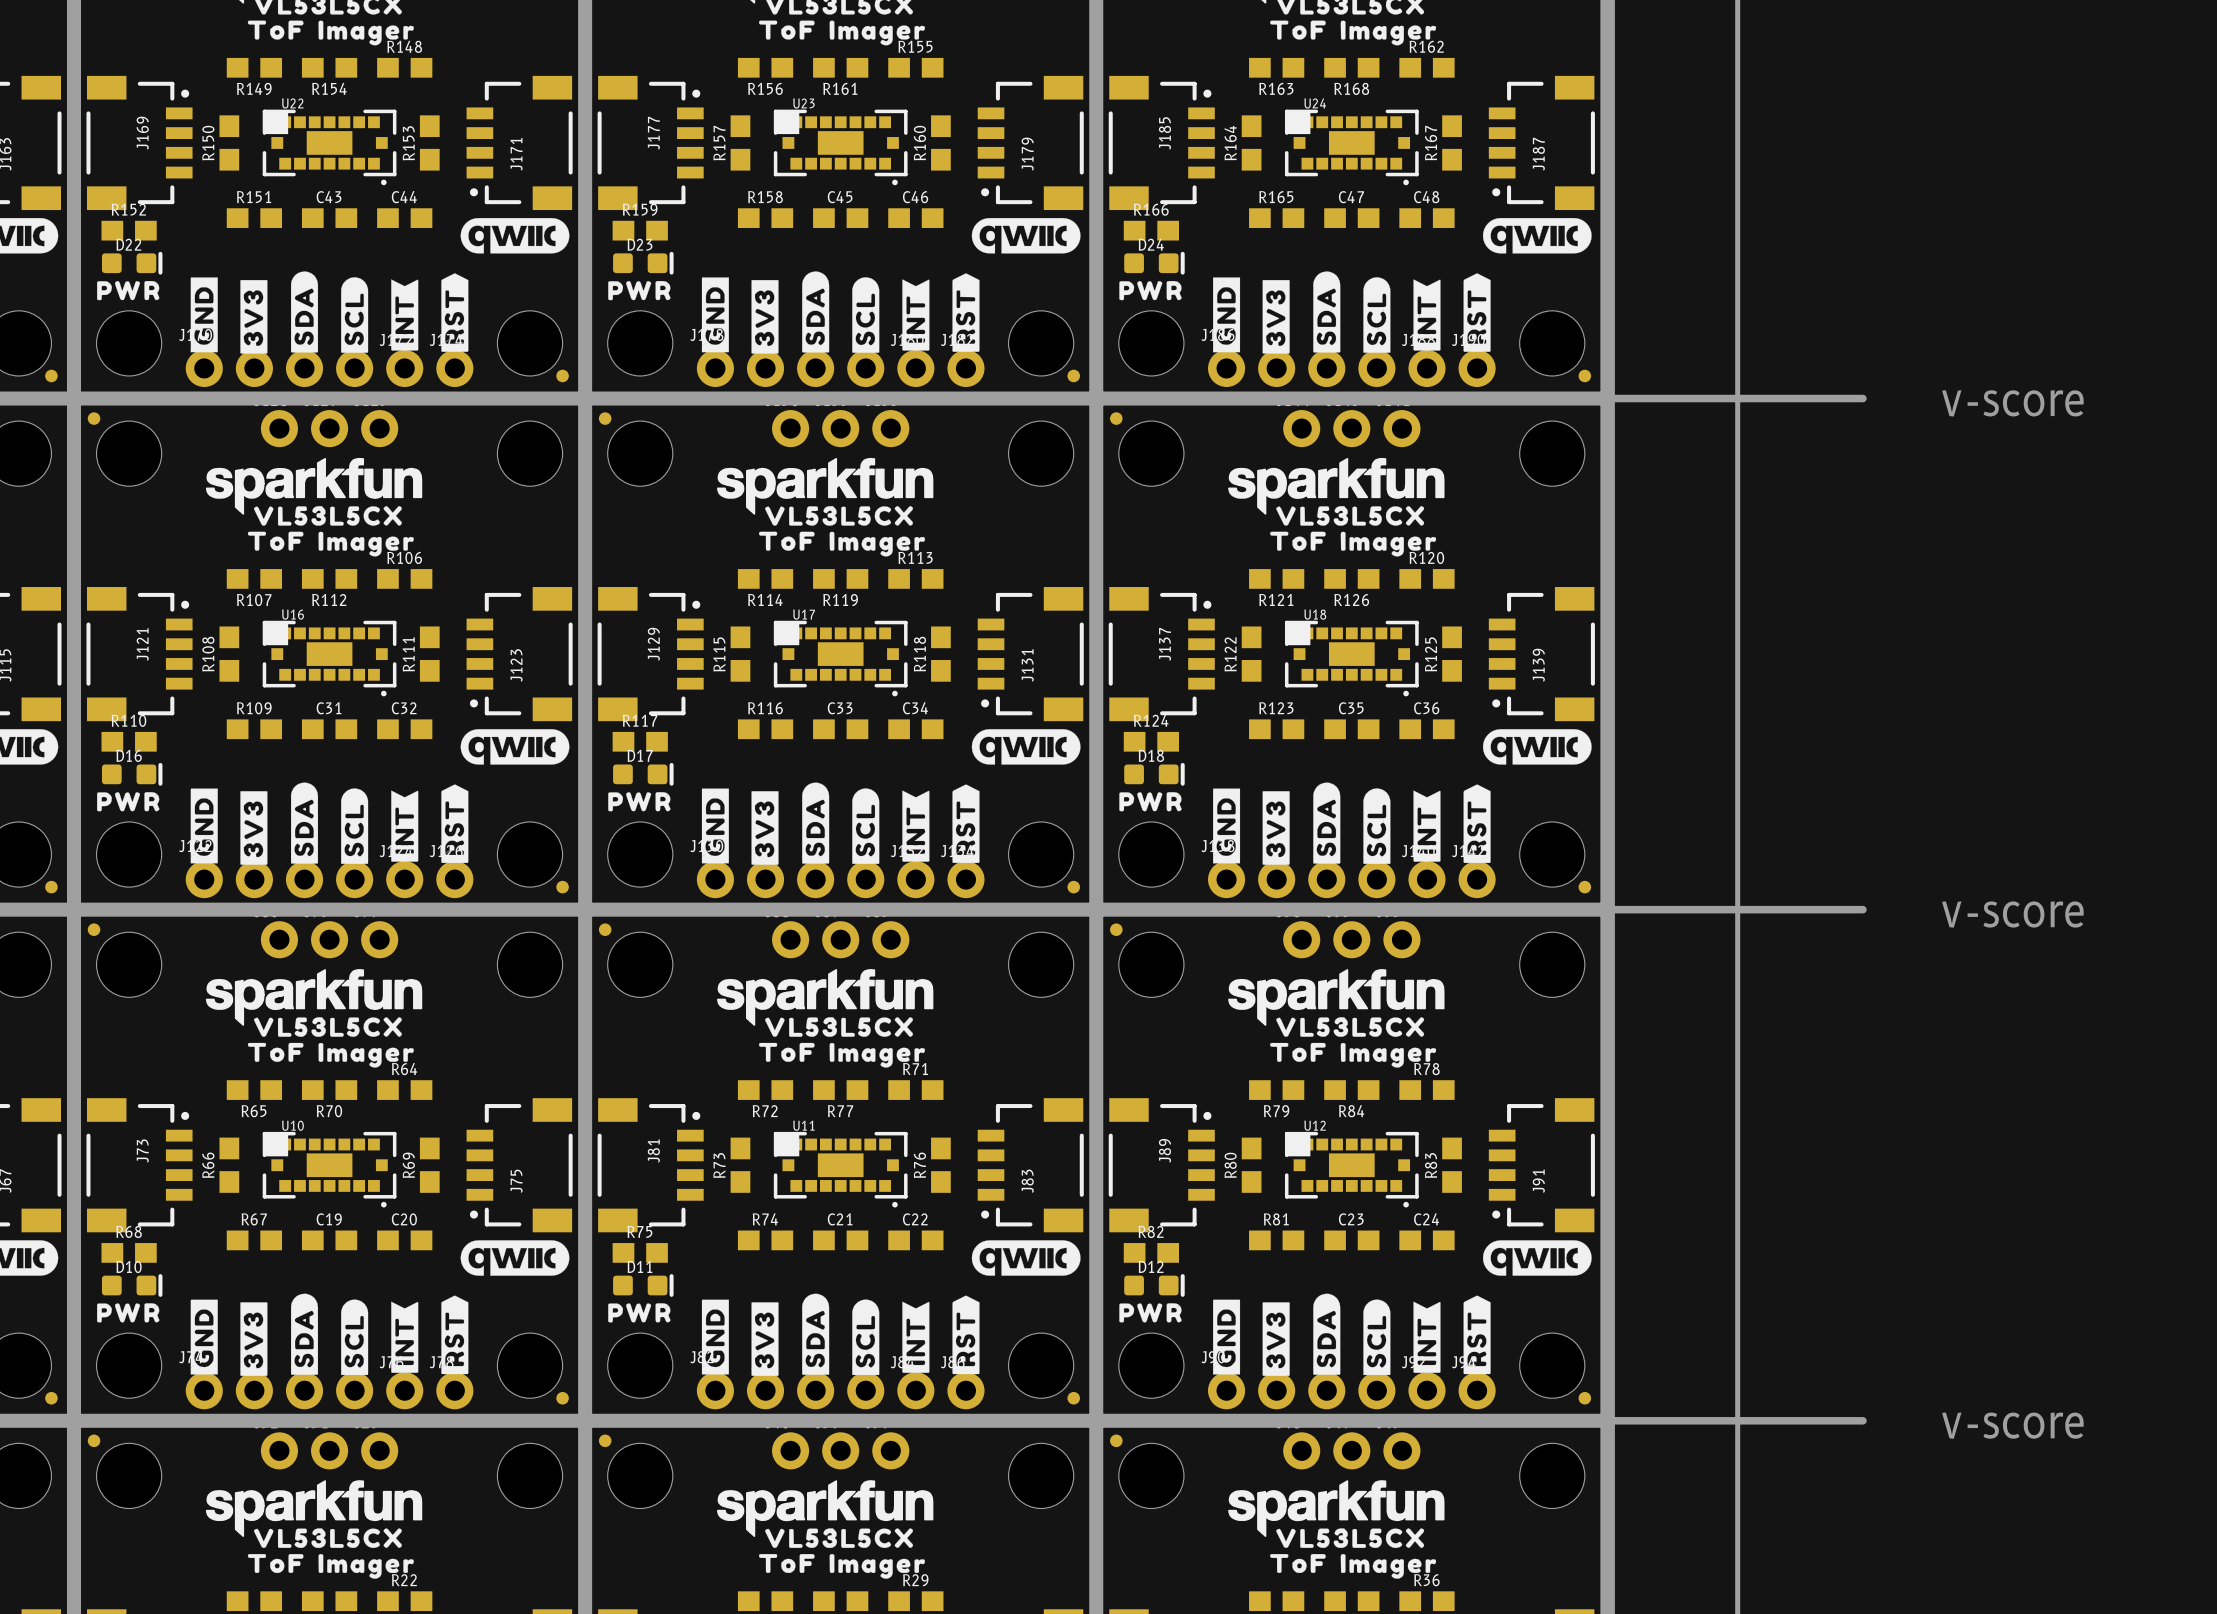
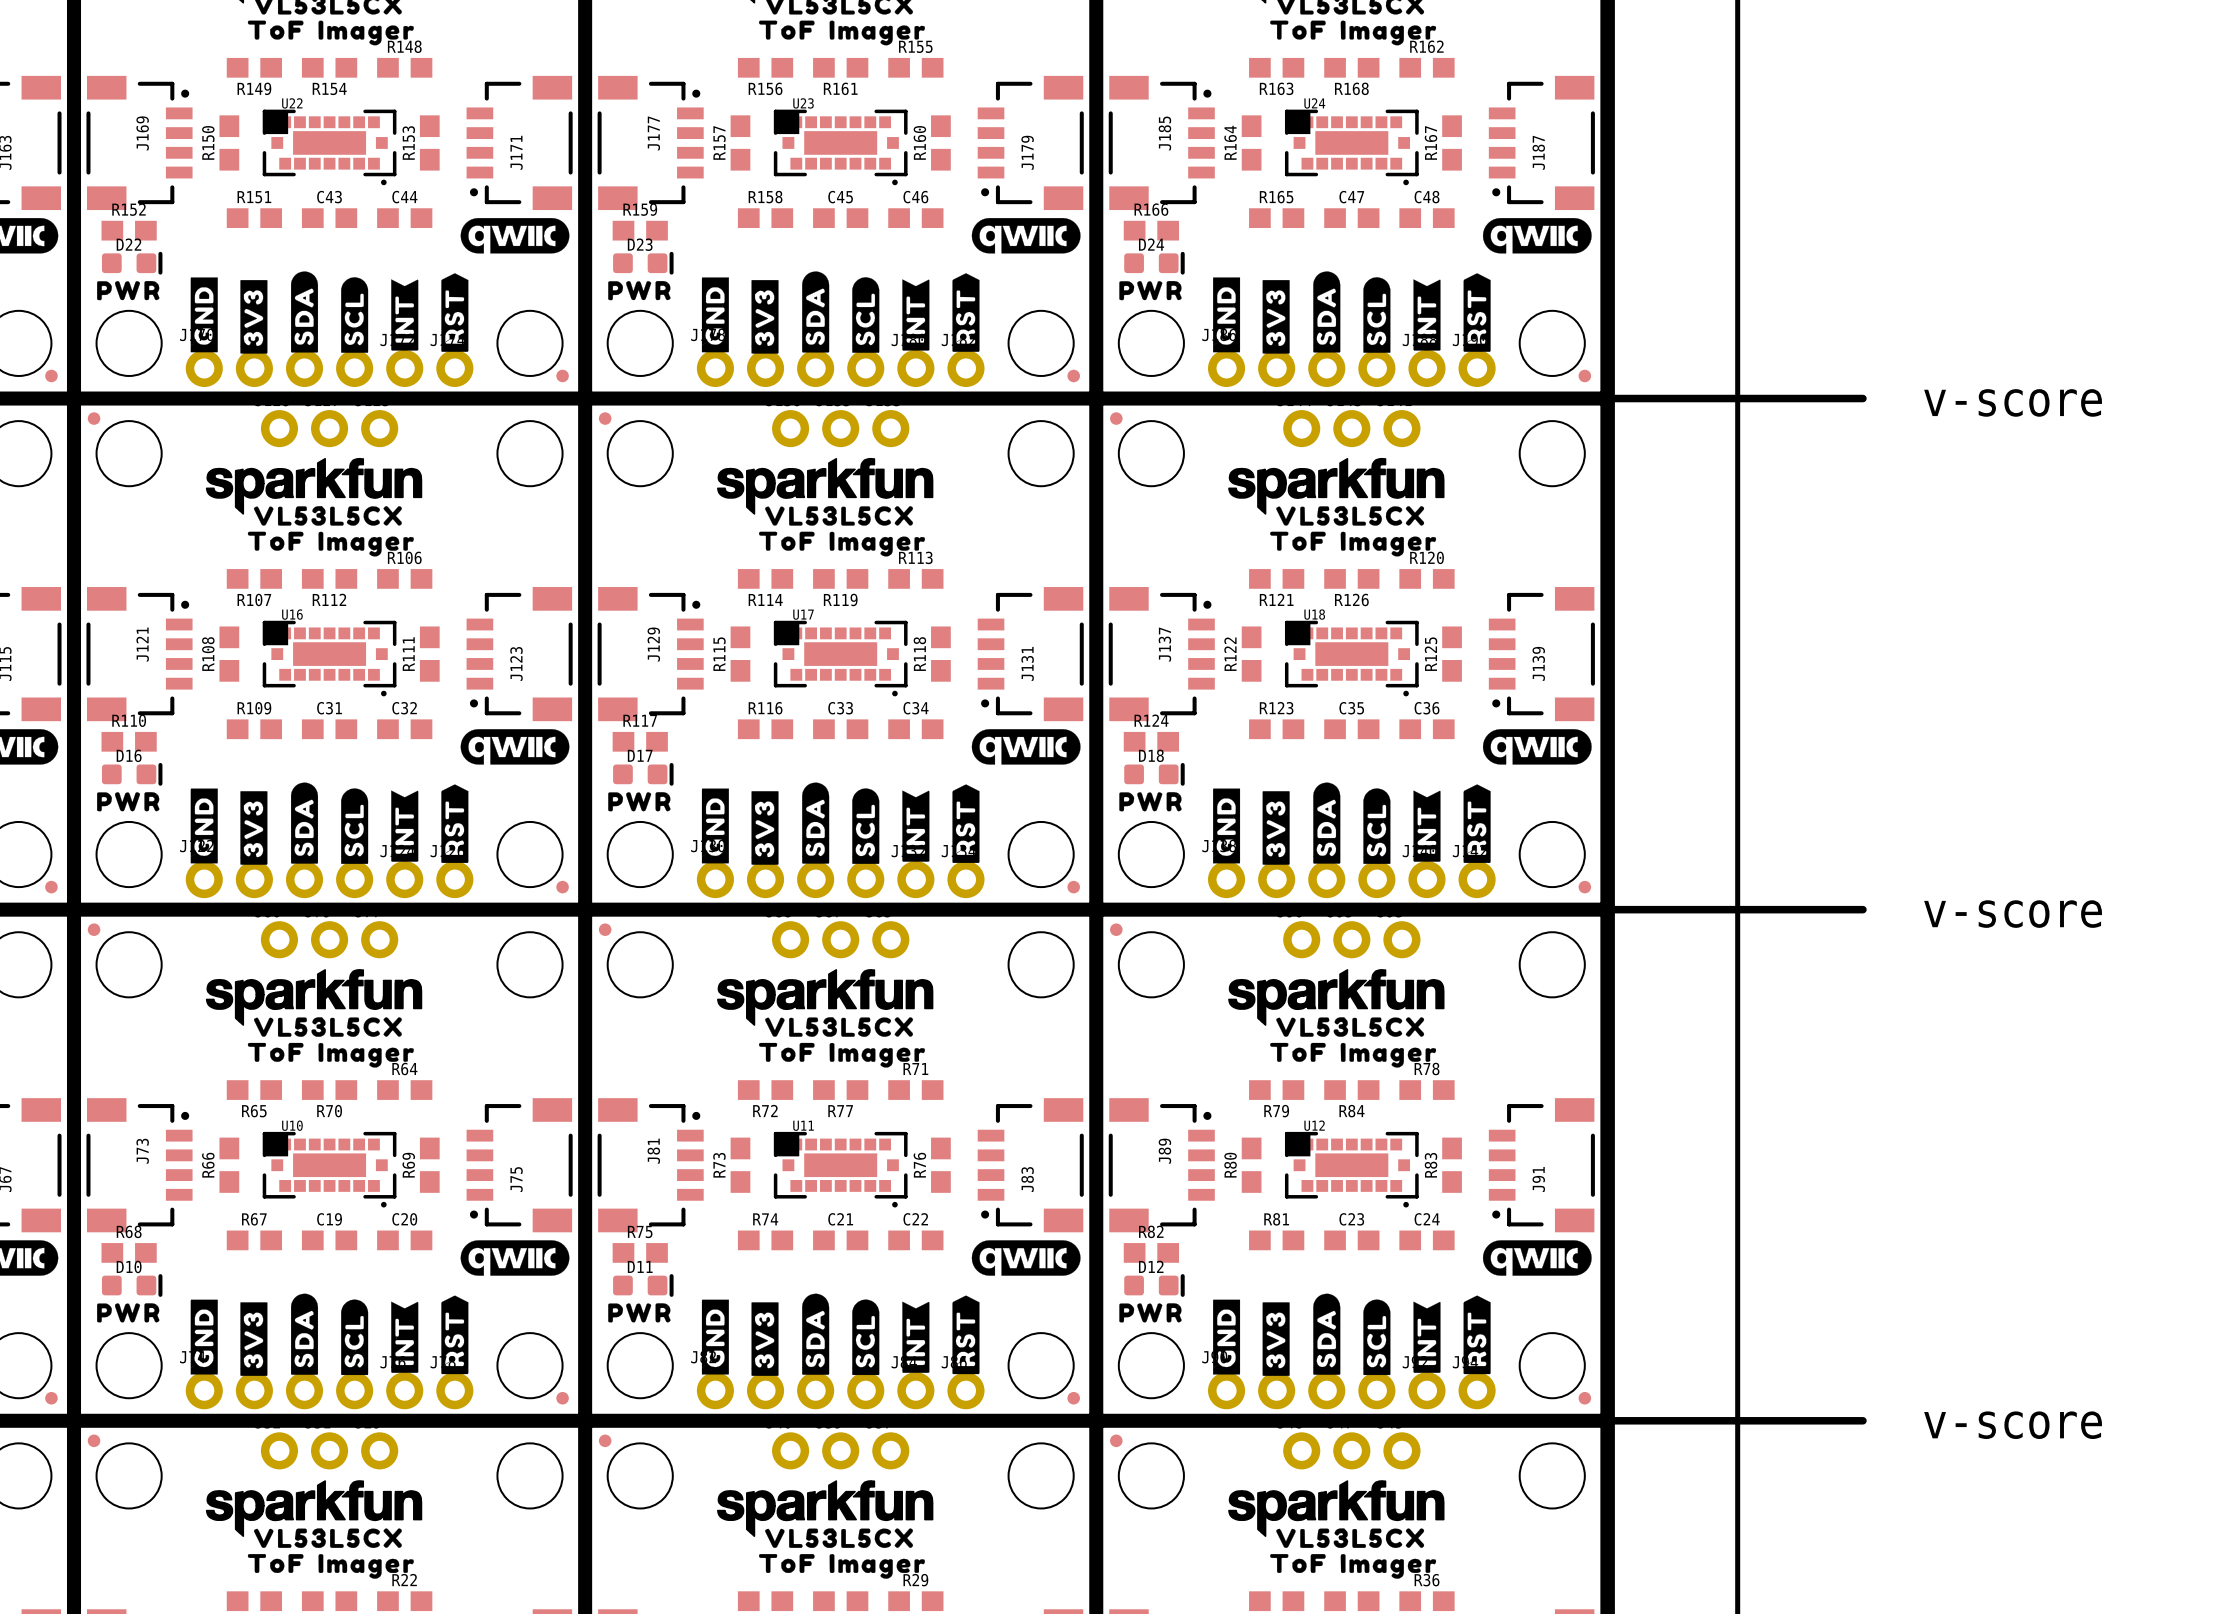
U22 footprint: [262, 109, 397, 186] -> [262, 109, 397, 186]
U23 footprint: [773, 109, 908, 186] -> [773, 109, 908, 186]
U24 footprint: [1284, 109, 1419, 186] -> [1284, 109, 1419, 186]
U16 footprint: [262, 620, 397, 697] -> [262, 620, 397, 697]
U17 footprint: [773, 620, 908, 697] -> [773, 620, 908, 697]
U18 footprint: [1284, 620, 1419, 697] -> [1284, 620, 1419, 697]
U10 footprint: [262, 1131, 397, 1208] -> [262, 1131, 397, 1208]
U11 footprint: [773, 1131, 908, 1208] -> [773, 1131, 908, 1208]
U12 footprint: [1284, 1131, 1419, 1208] -> [1284, 1131, 1419, 1208]

